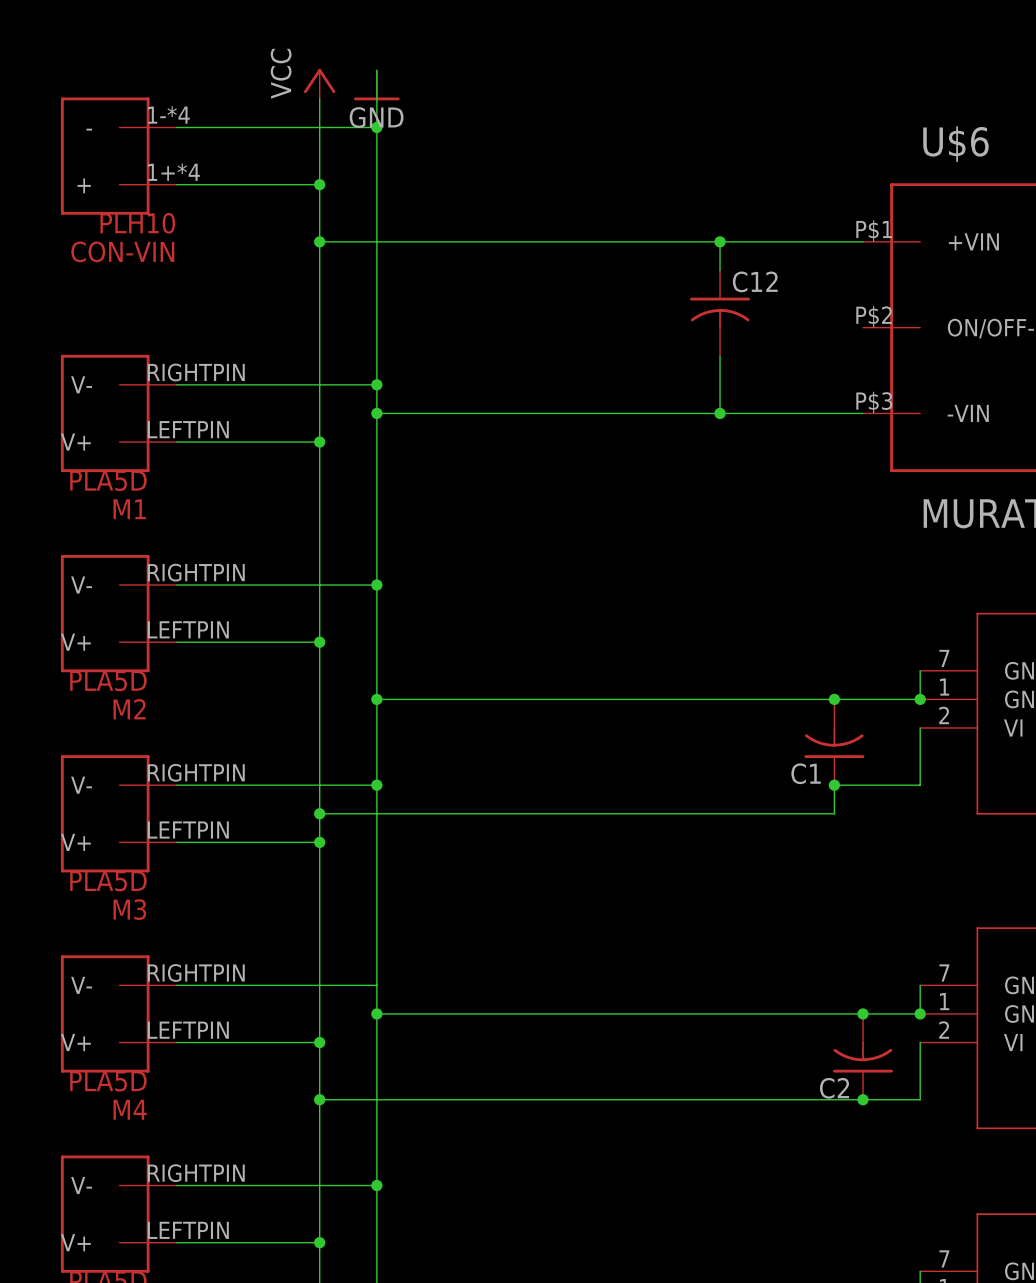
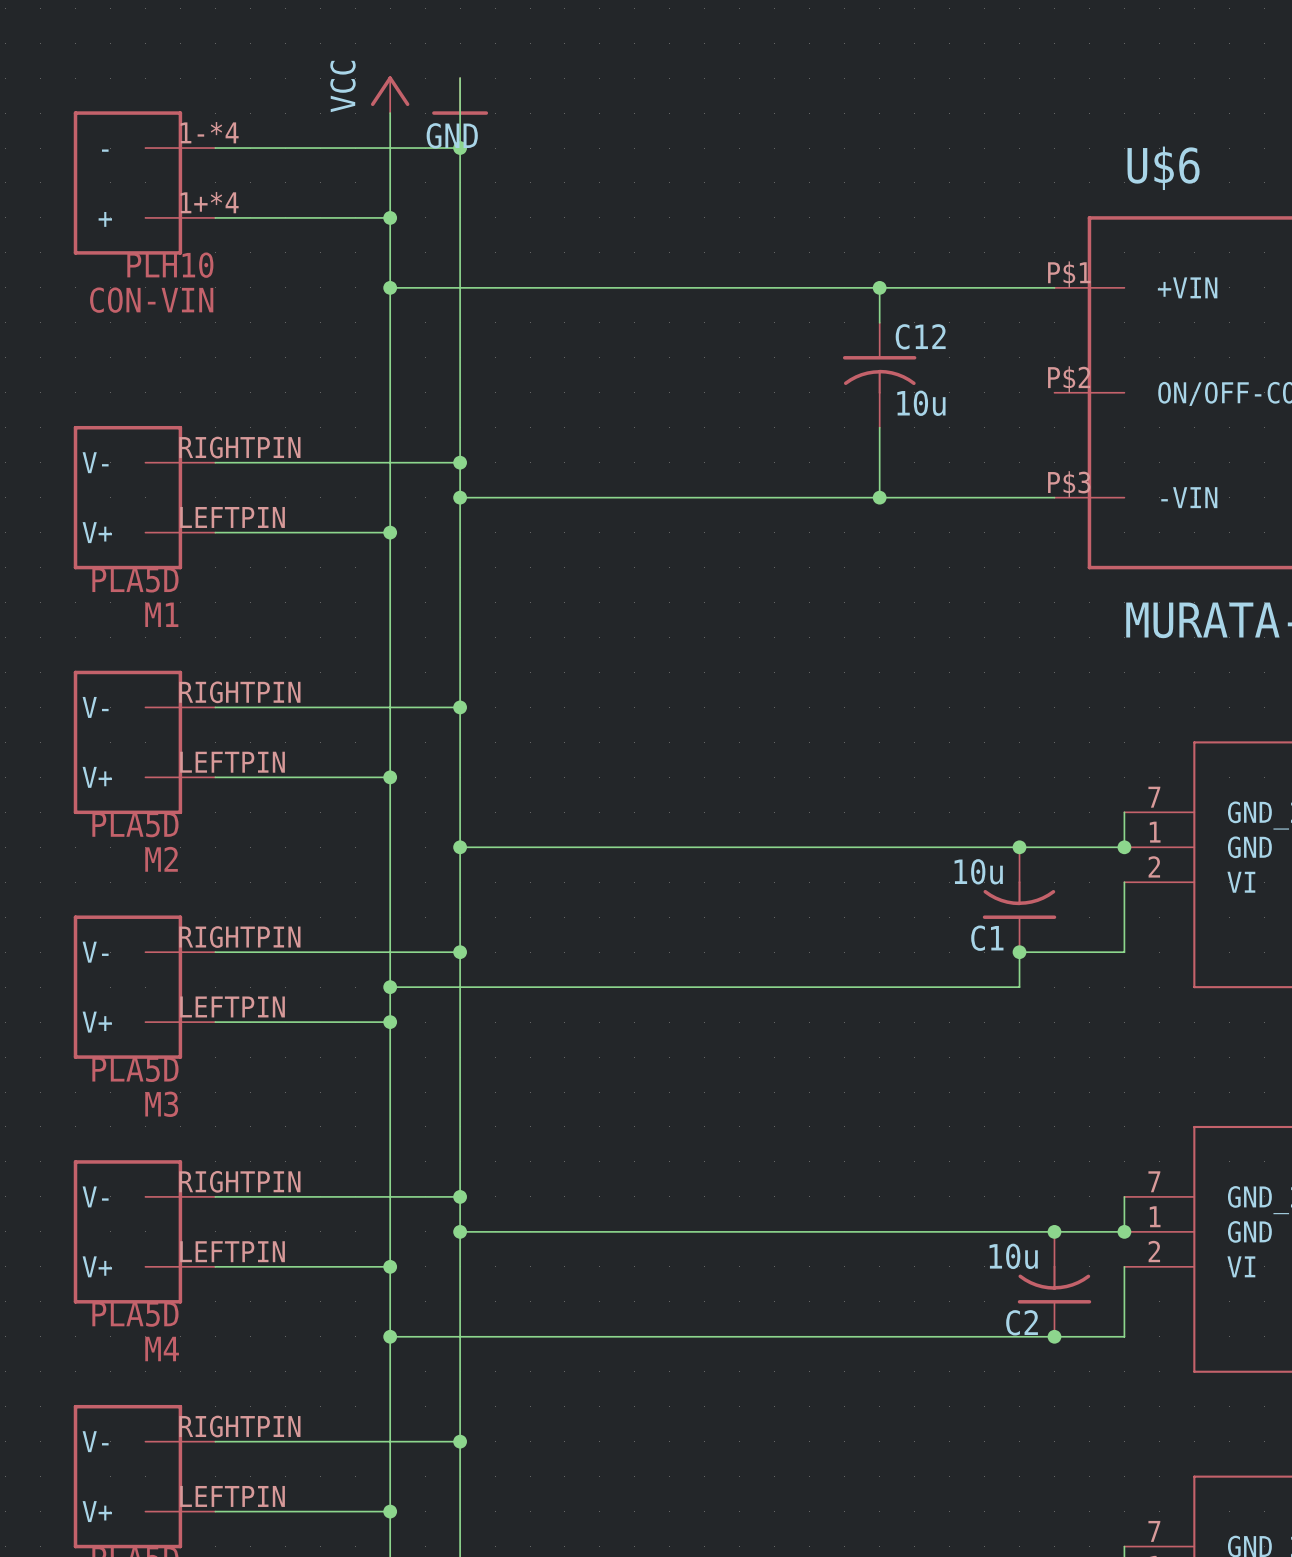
C12 value: none -> 10u (921, 403)
C1 value: none -> 10u (978, 871)
junction: none -> (460, 1196)
C2 value: none -> 10u (1013, 1256)

